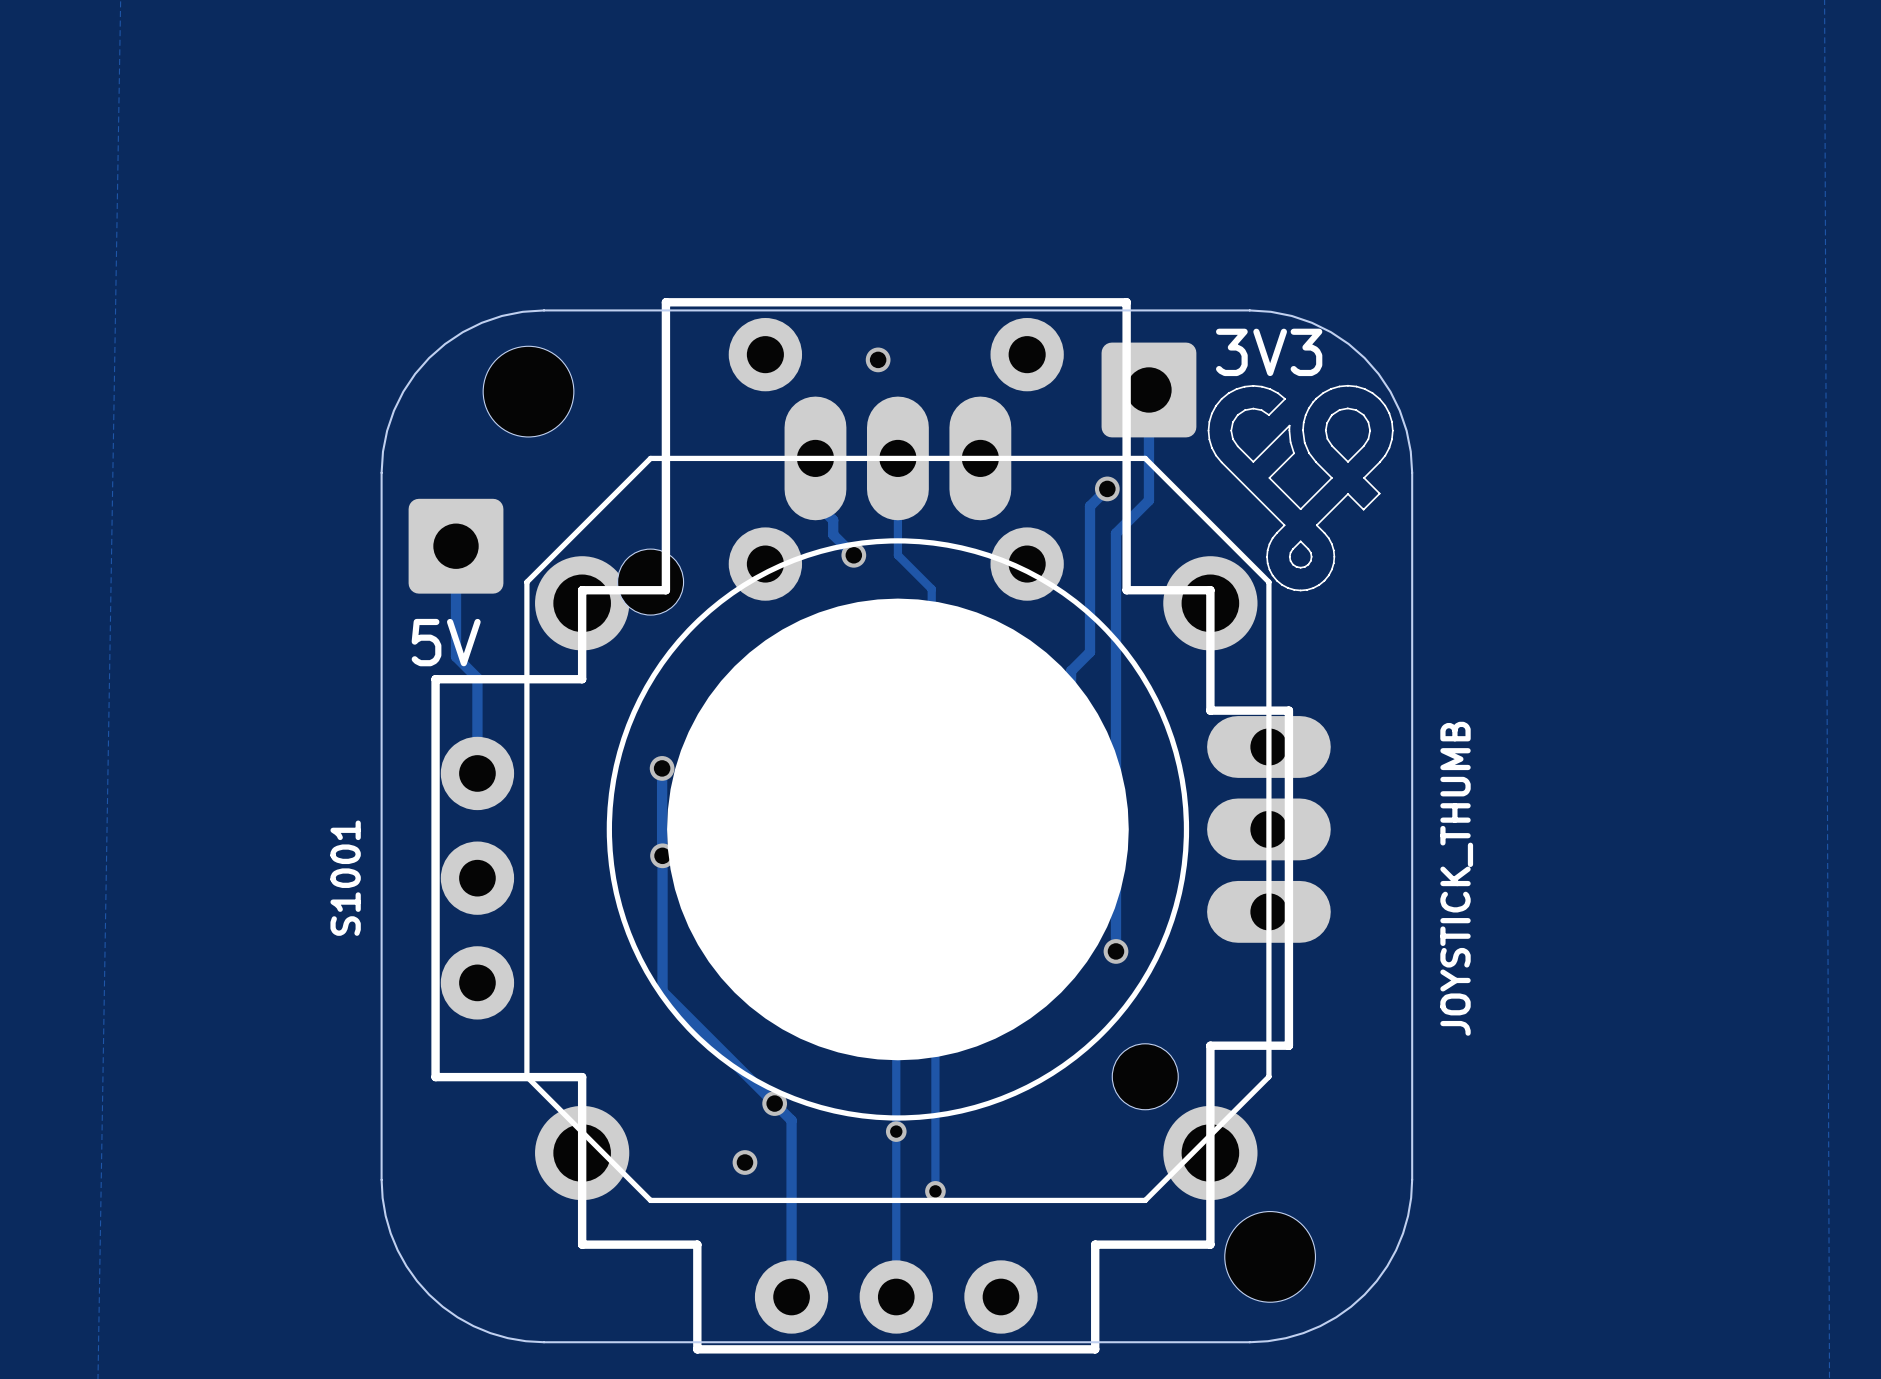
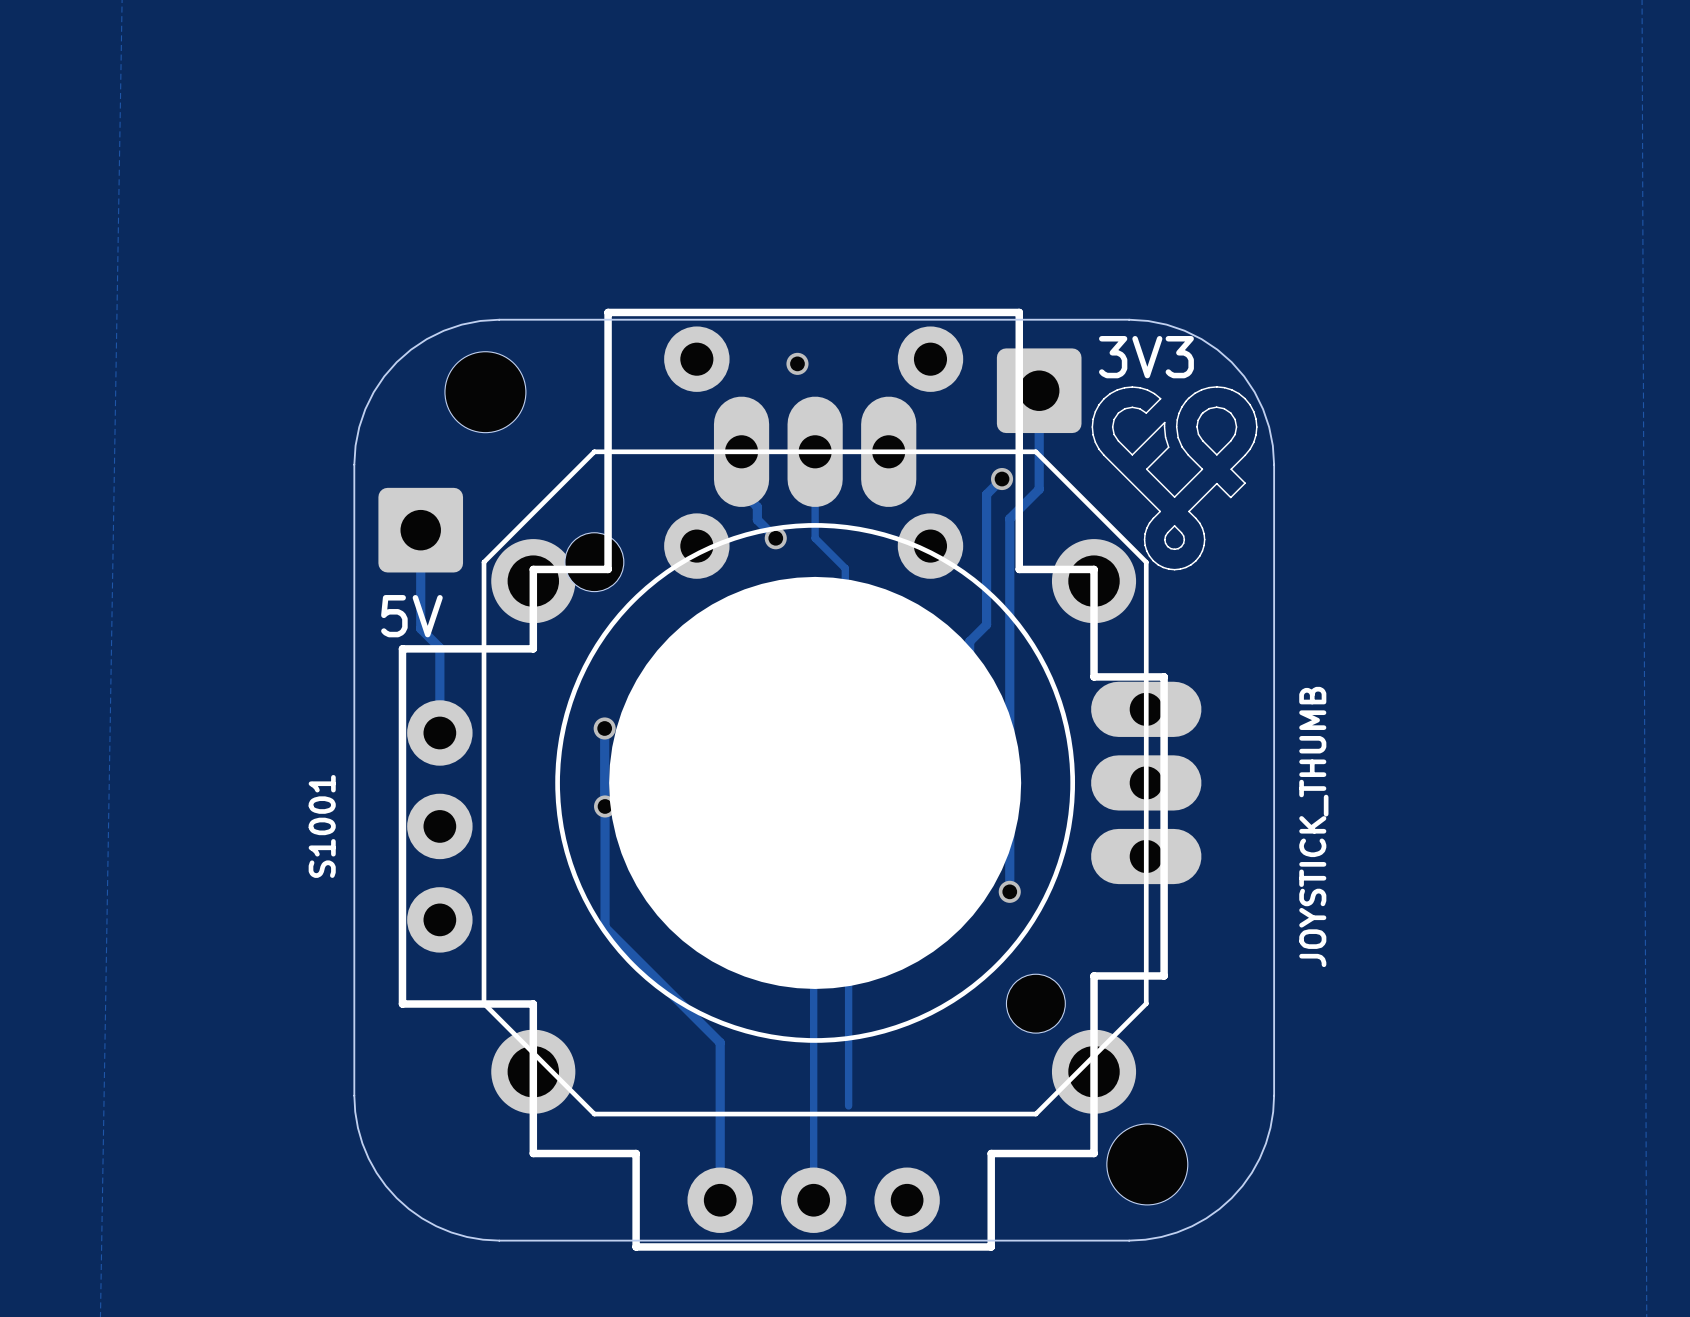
via: (774, 1103) -> none
via: (896, 1131) -> none
via: (744, 1162) -> none
via: (935, 1191) -> none

